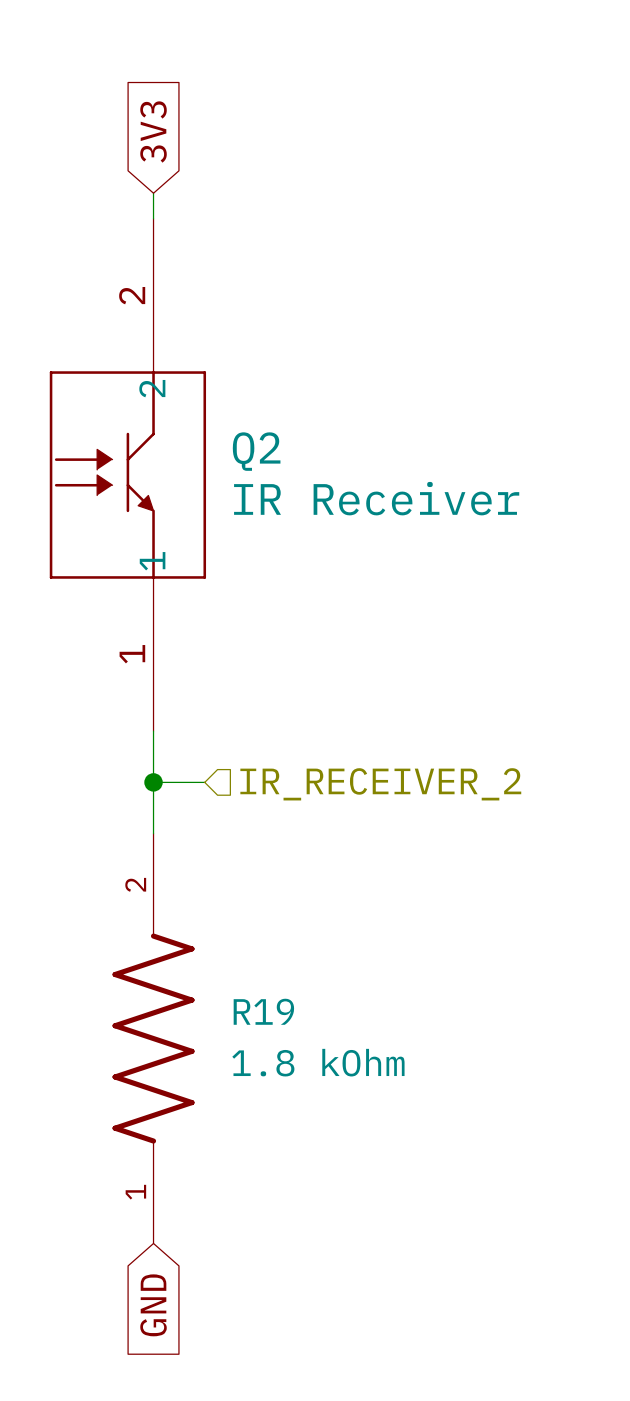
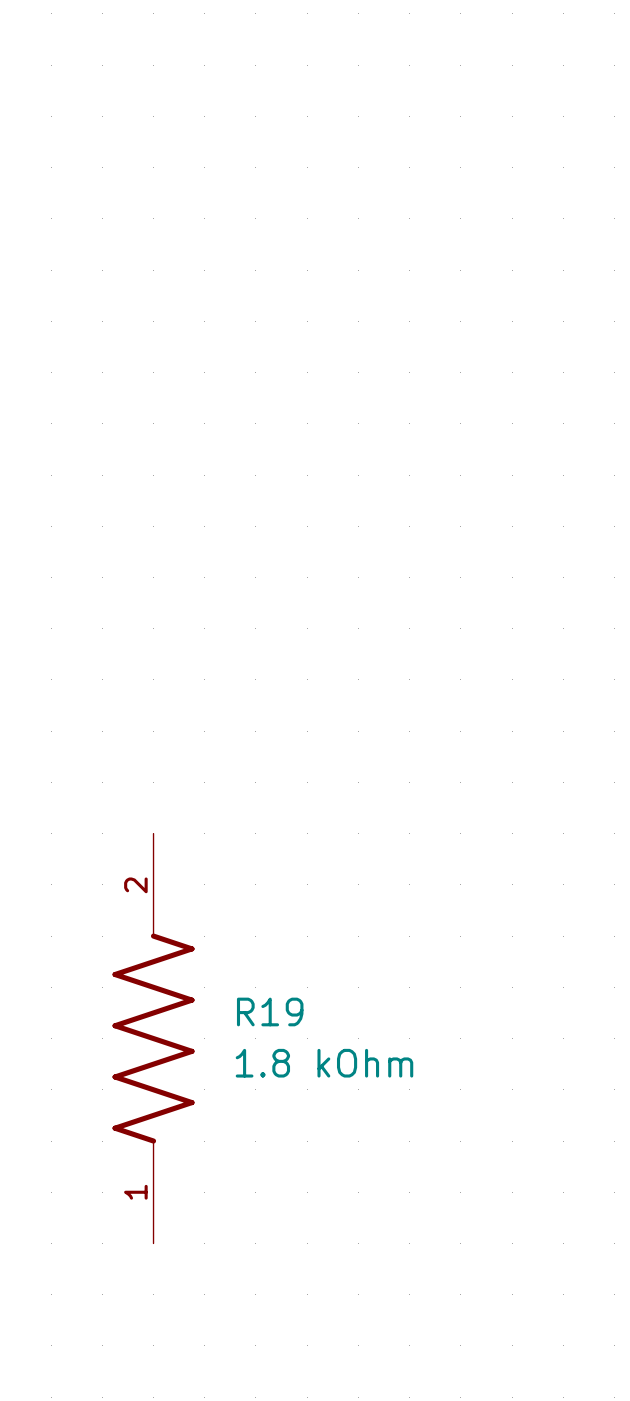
global label: 3V3 (153, 132) -> none
wire: (153, 193) (153, 218) -> none
Q2: IR Receiver (127, 475) -> none
wire: (153, 731) (153, 833) -> none
wire: (153, 782) (204, 782) -> none
junction: (153, 782) -> none
hierarchical label: IR_RECEIVER_2 (380, 784) -> none
global label: GND (153, 1305) -> none

